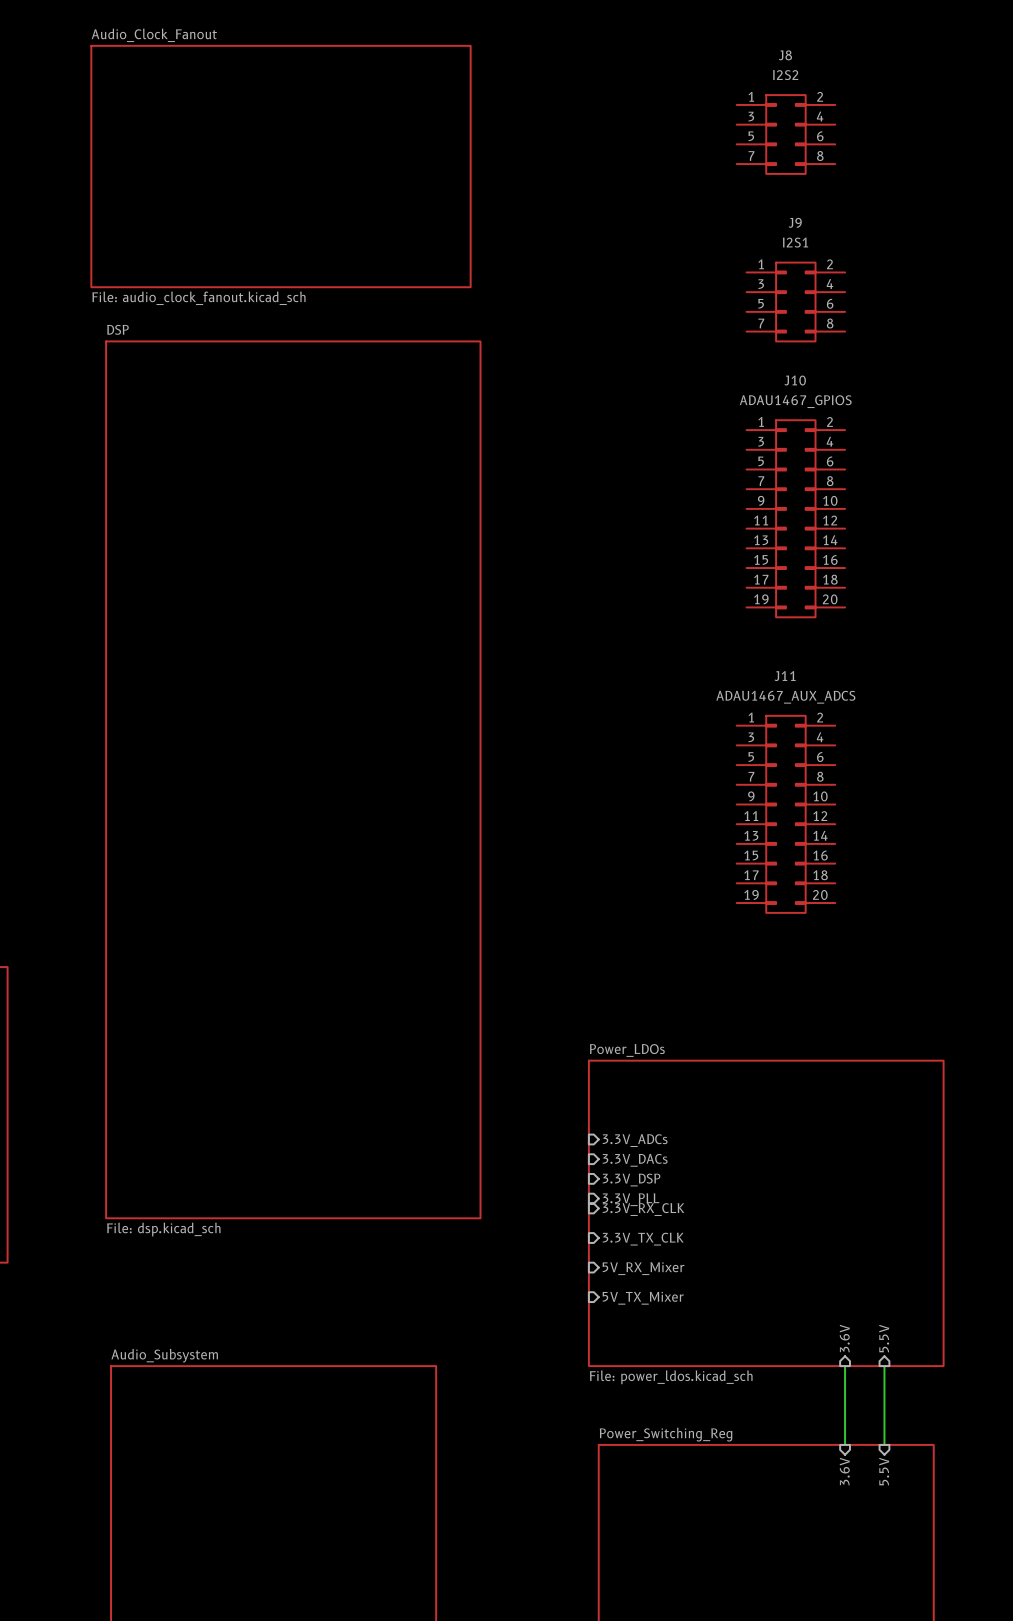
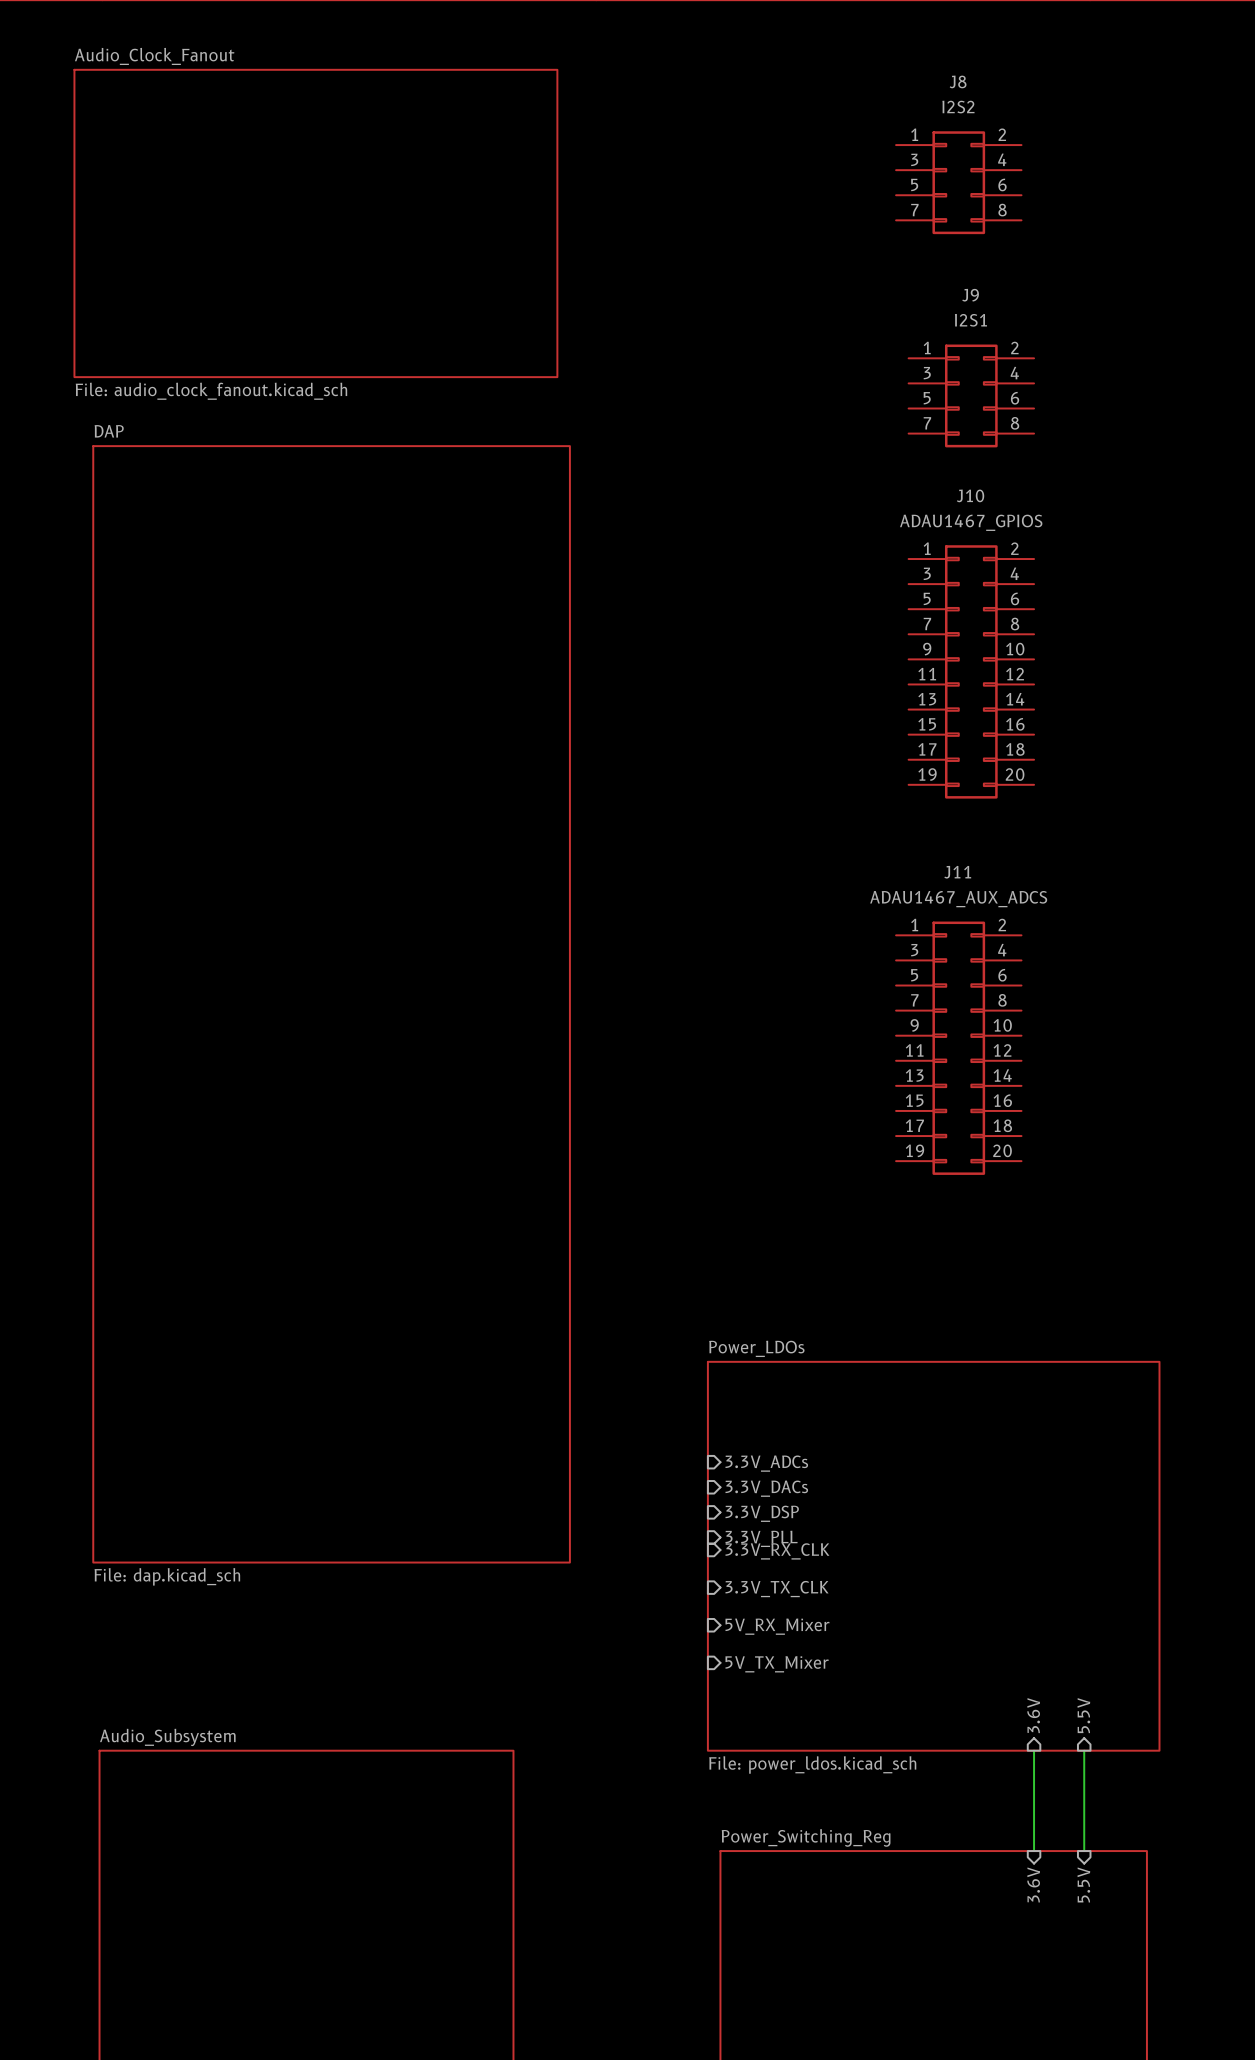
sheet DSP name: DSP (117, 329) -> DAP (109, 431)
sheet DSP value: File: dsp.kicad_sch (163, 1229) -> File: dap.kicad_sch (167, 1576)

